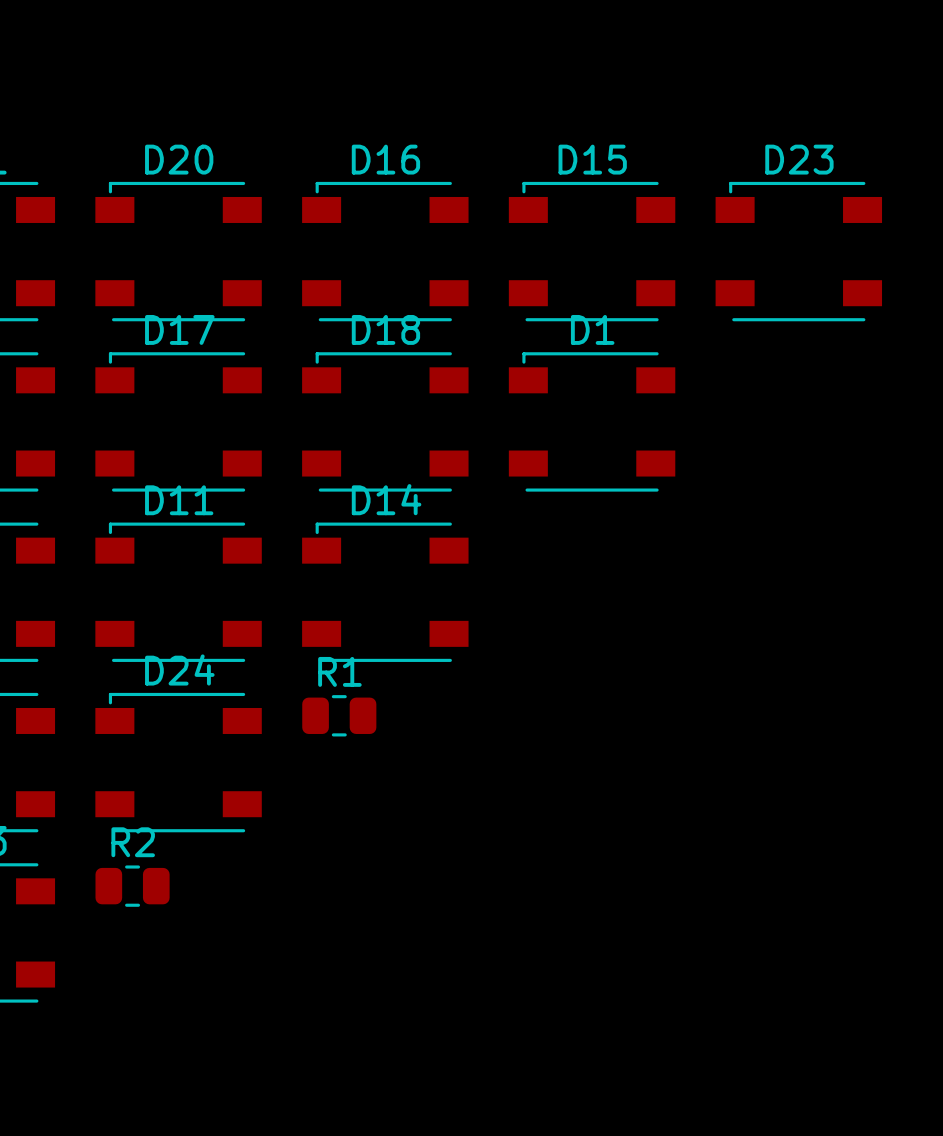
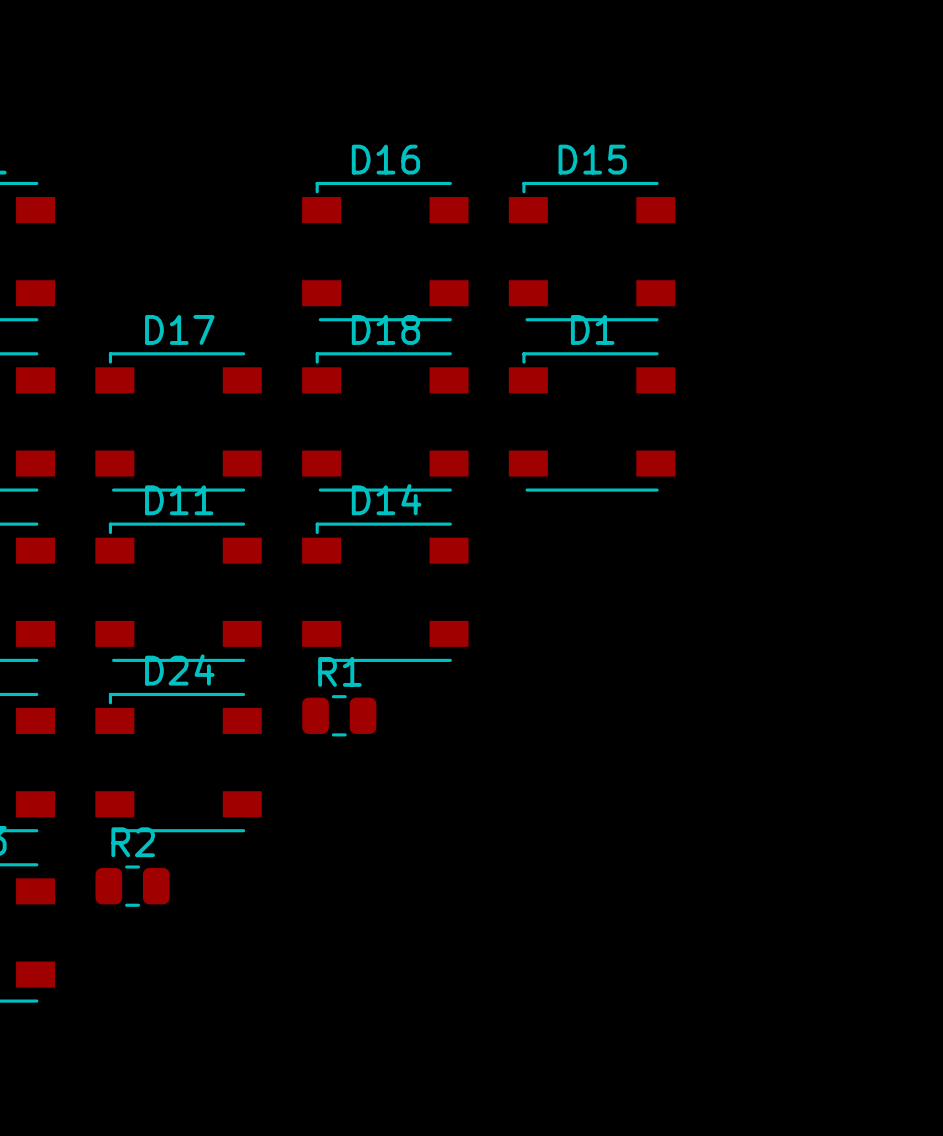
D20: (178, 251) -> none
D23: (798, 251) -> none

